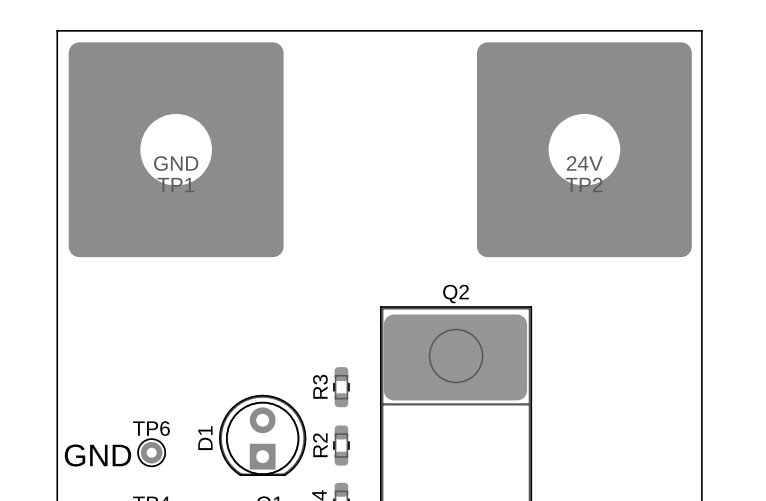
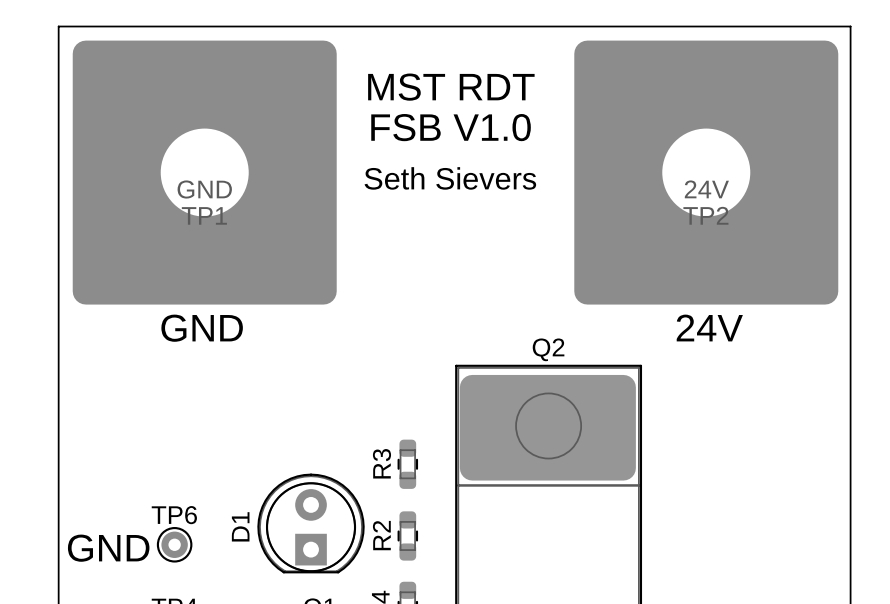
text: none -> MST RDT (451, 87)
text: none -> FSB V1.0 (451, 127)
text: none -> Seth Sievers (450, 178)
text: none -> GND (202, 328)
text: none -> 24V (709, 328)

